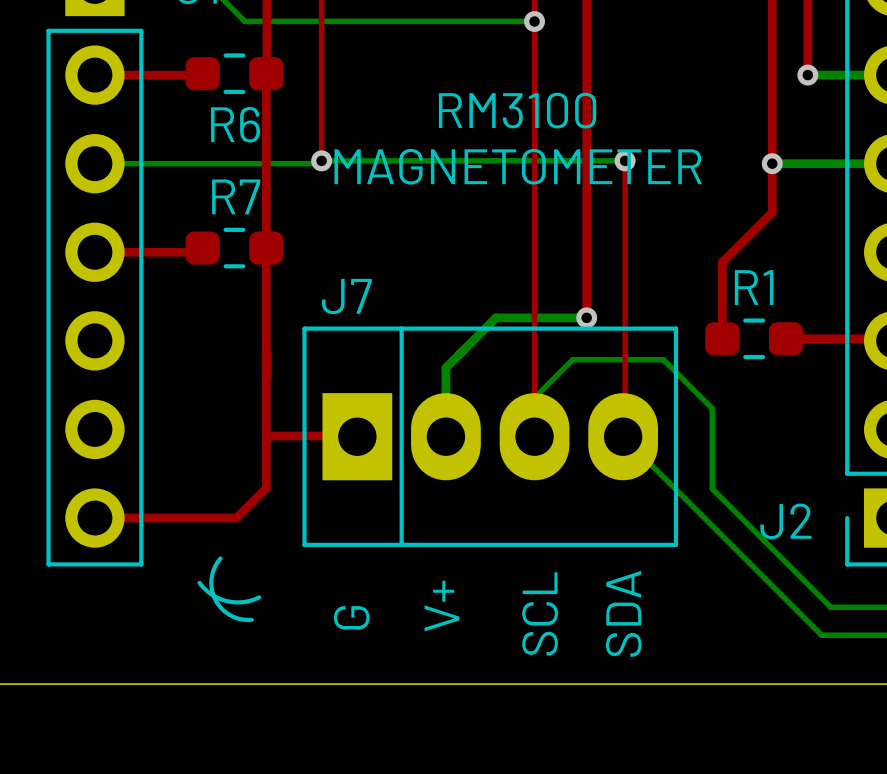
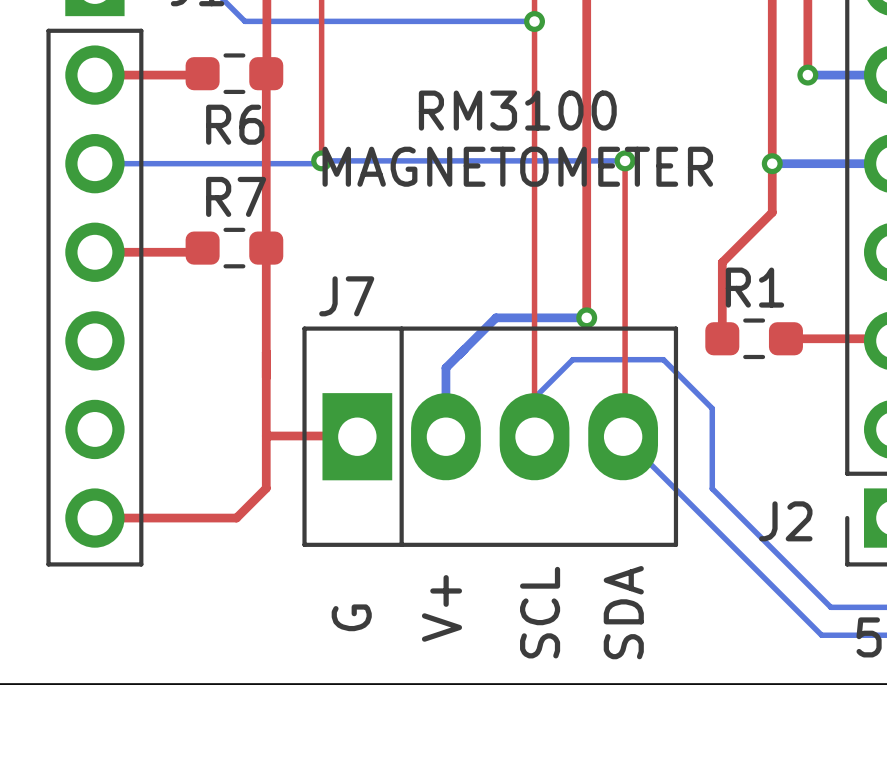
line: (220, 558) (215, 565) (211, 578) (211, 587) (215, 599) (223, 610) (230, 615) (242, 619) (251, 619) -> none
line: (199, 582) (211, 594) (226, 601) (243, 602) (259, 597) -> none

